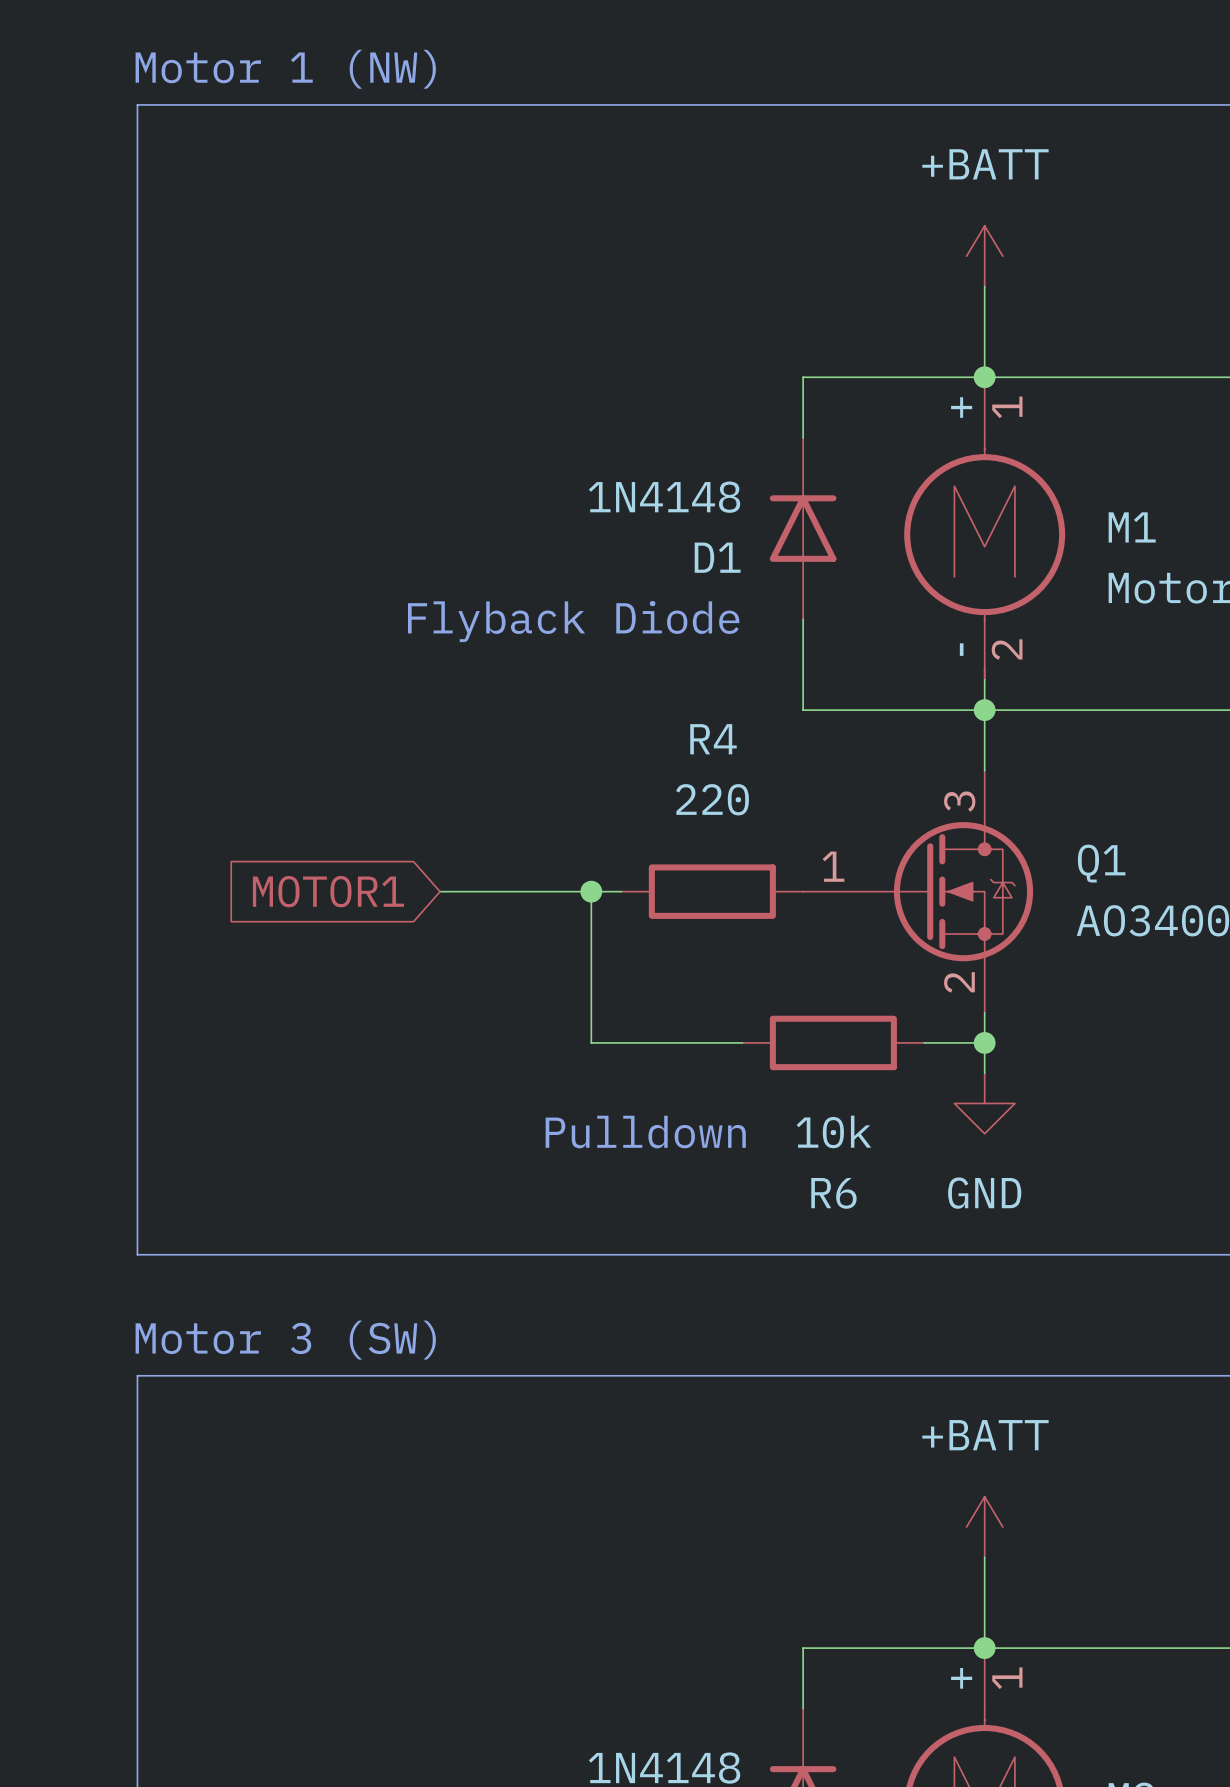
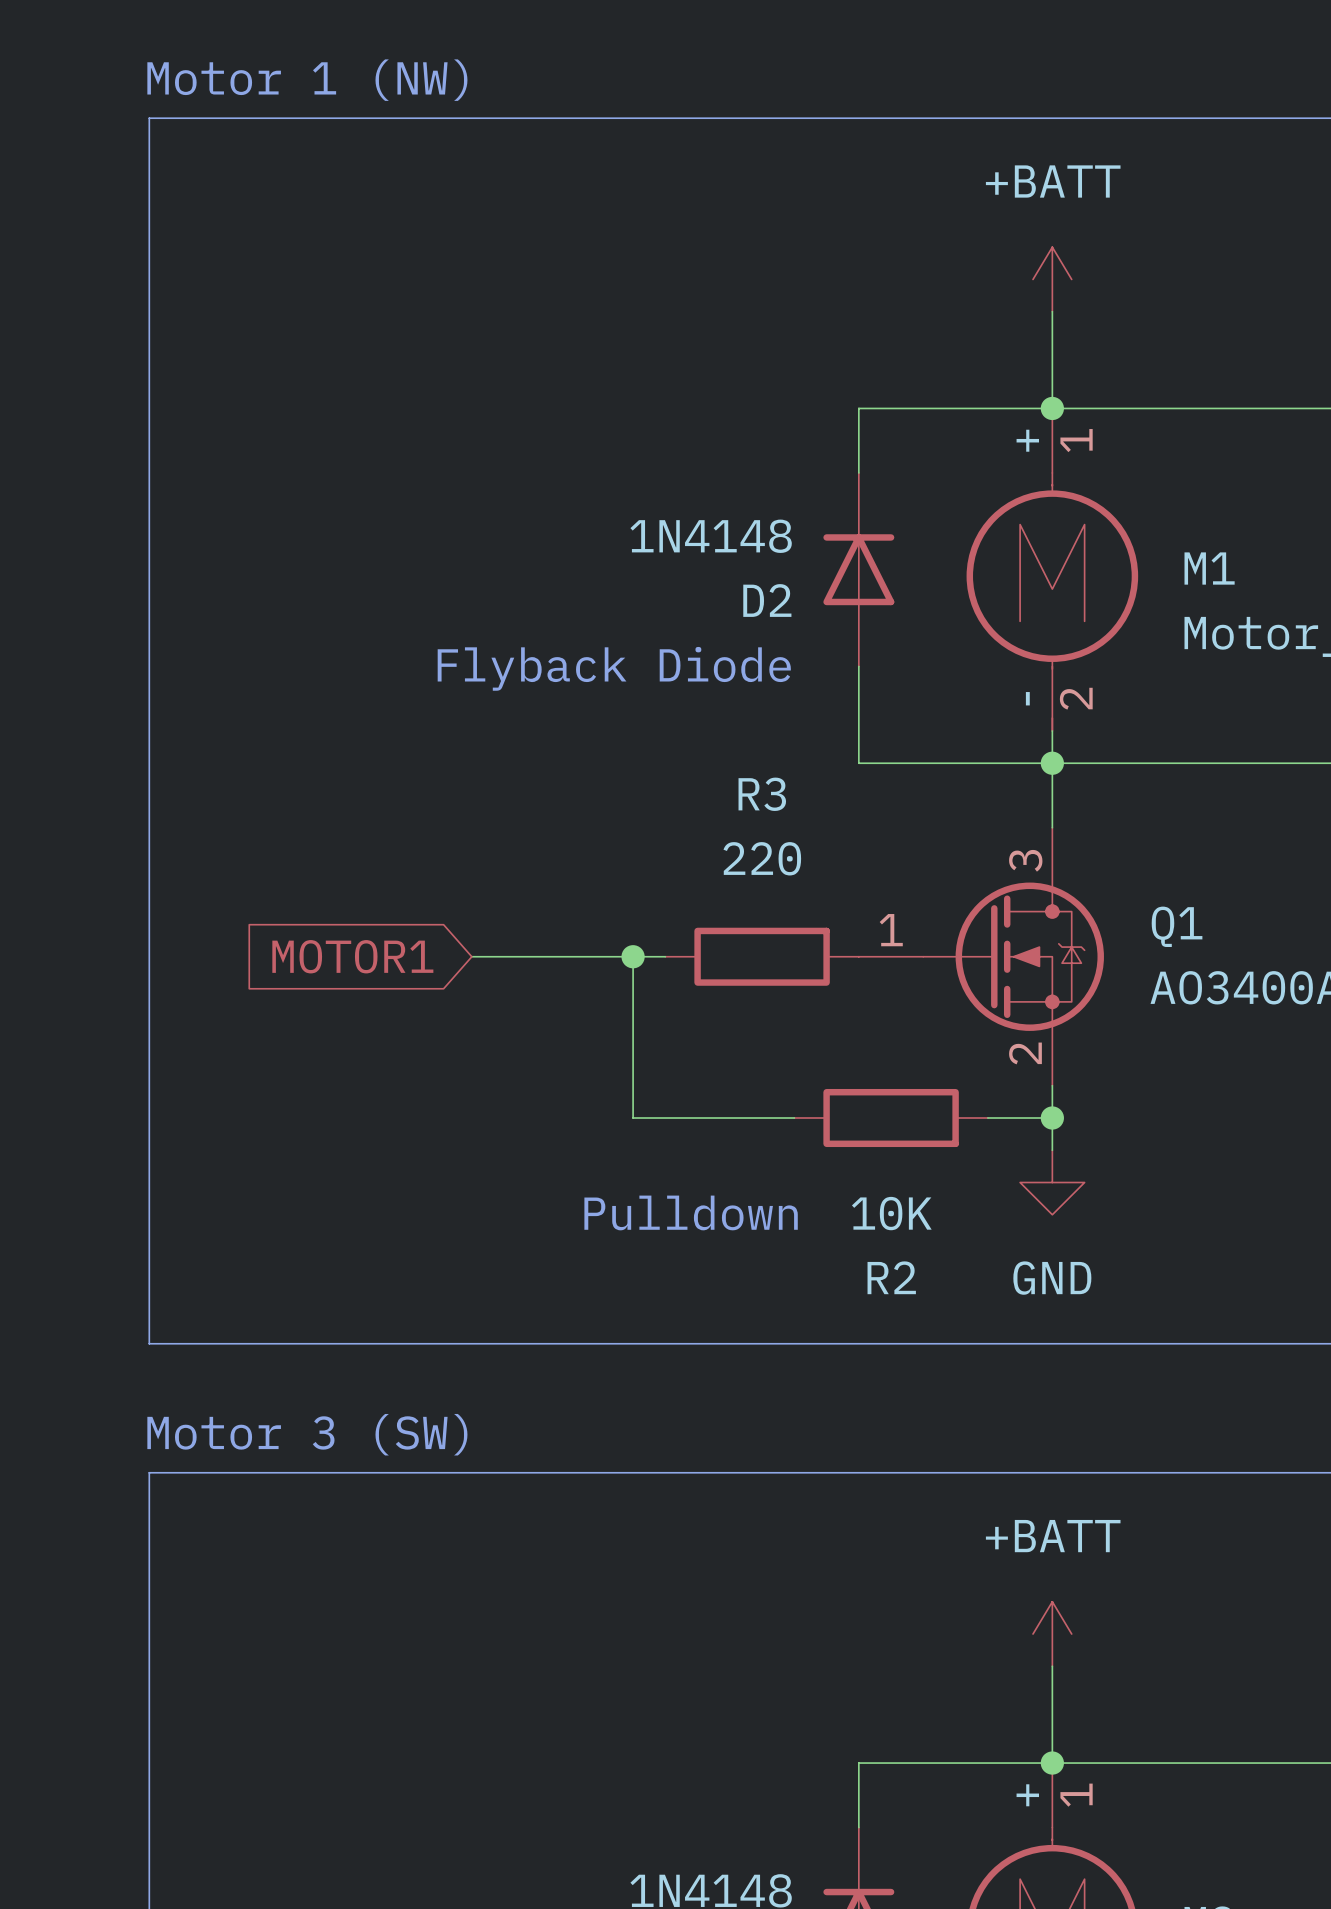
D1 name: D1 (717, 557) -> D2 (767, 600)
R4 name: R4 (713, 739) -> R3 (762, 794)
R6 value: 10k (833, 1131) -> 10K (891, 1213)
R6 name: R6 (833, 1193) -> R2 (891, 1277)

